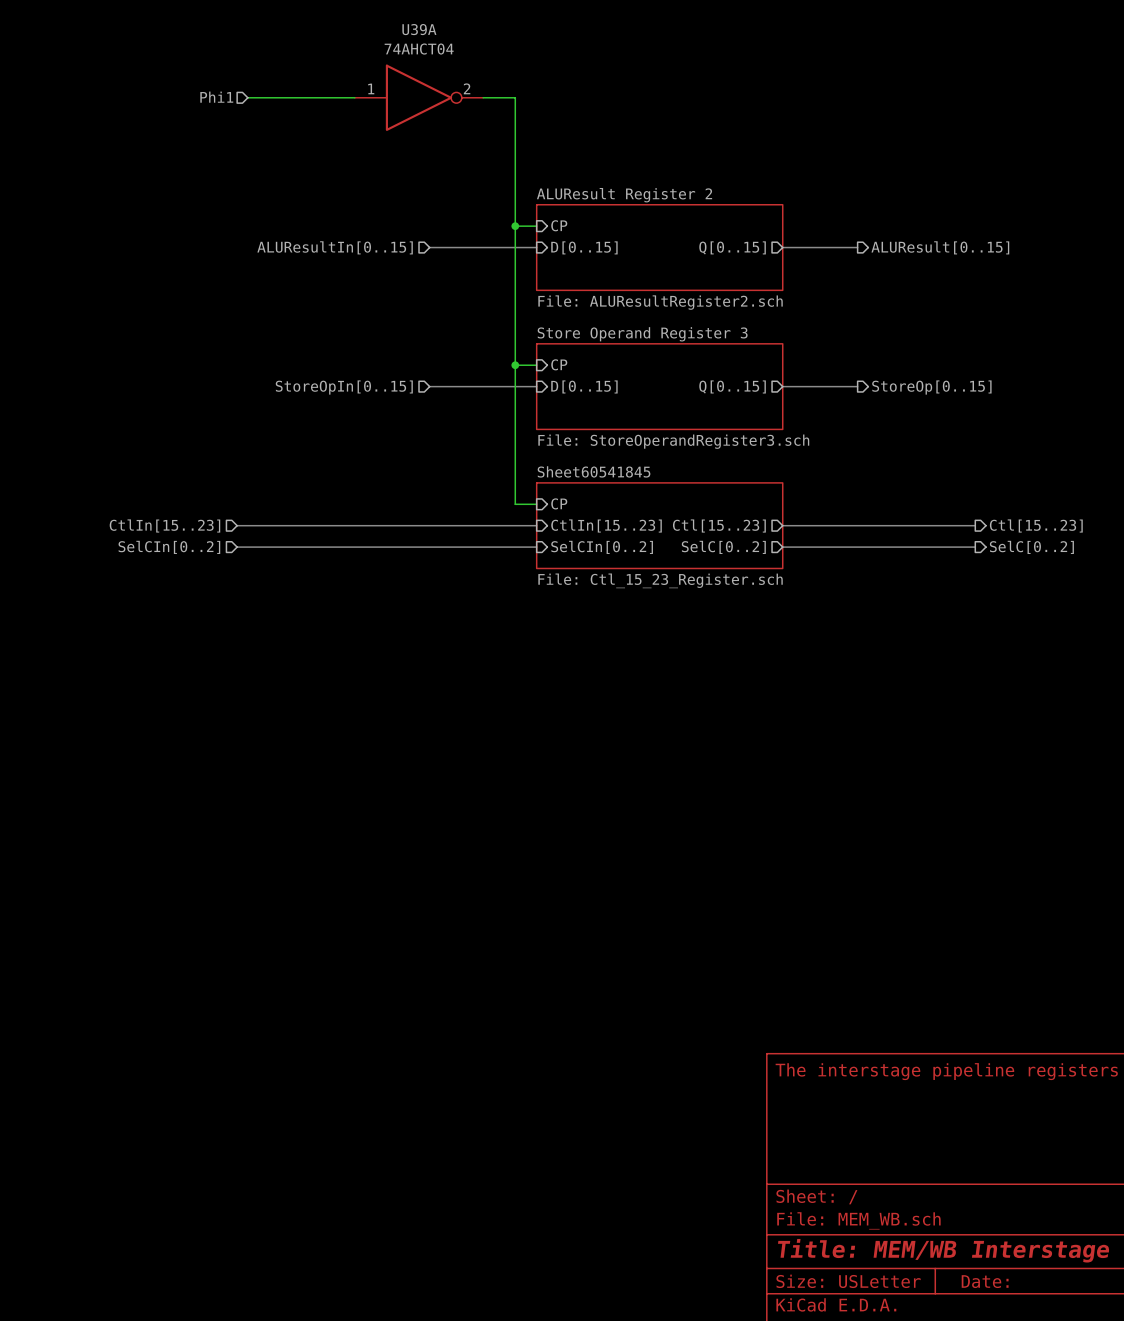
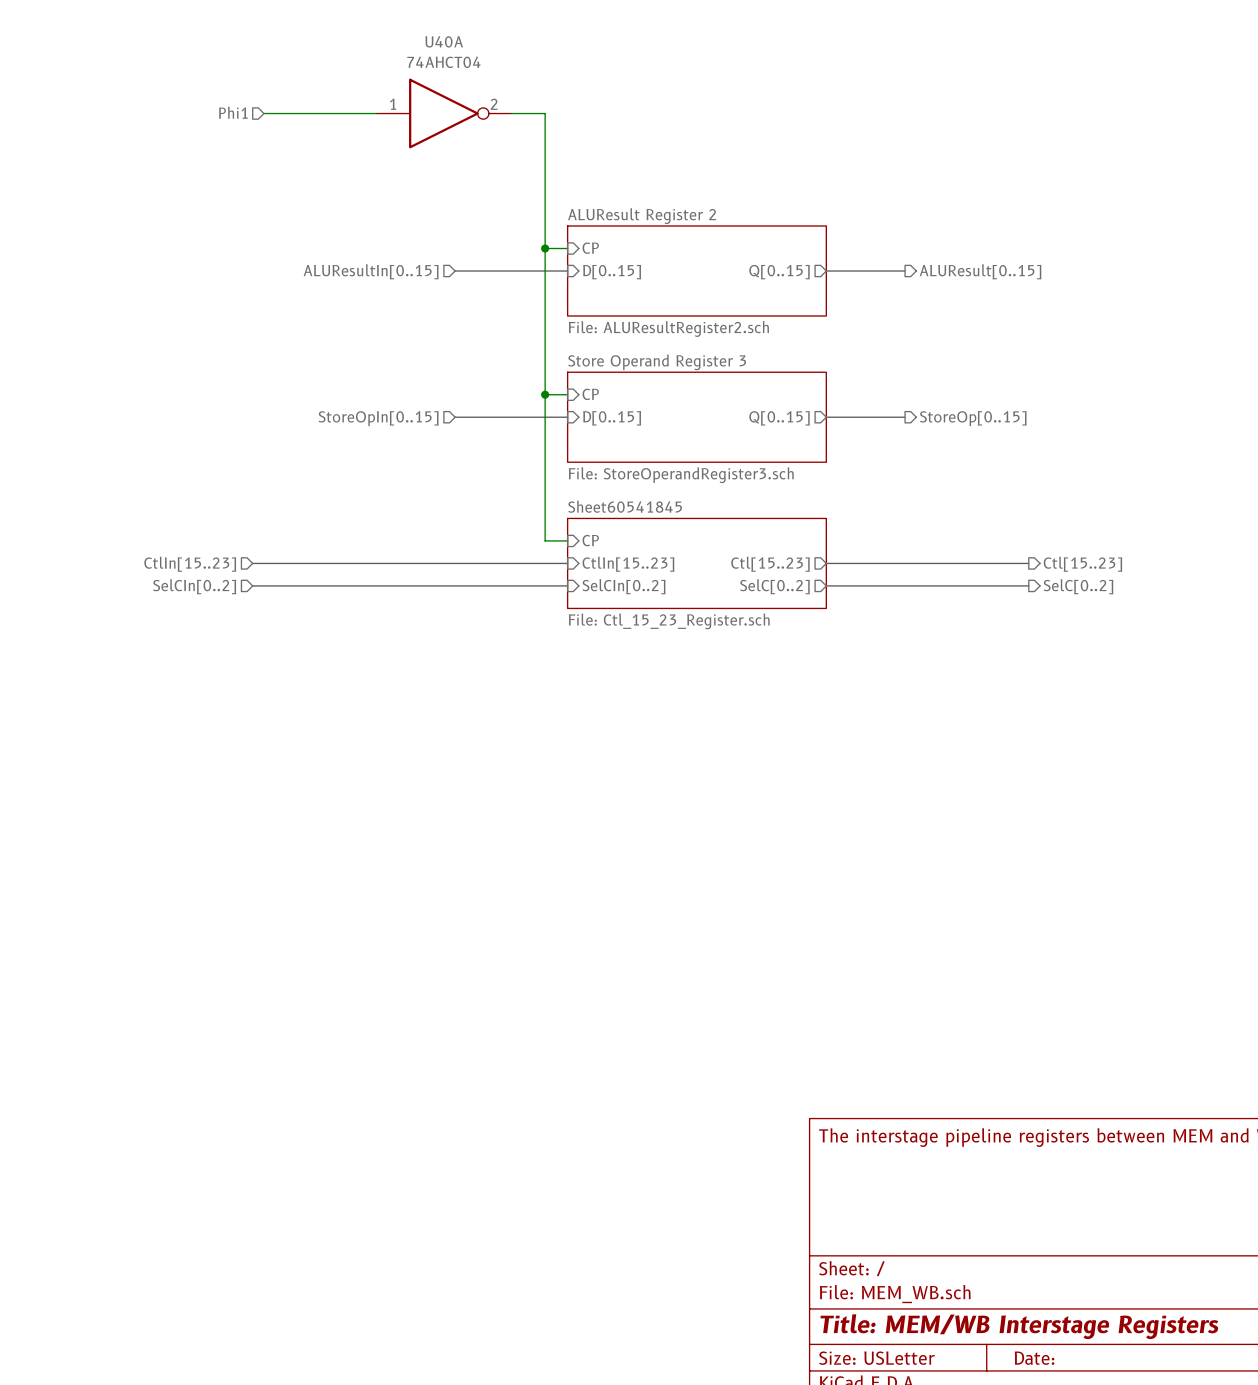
U39A name: U39A (419, 29) -> U40A (444, 41)

